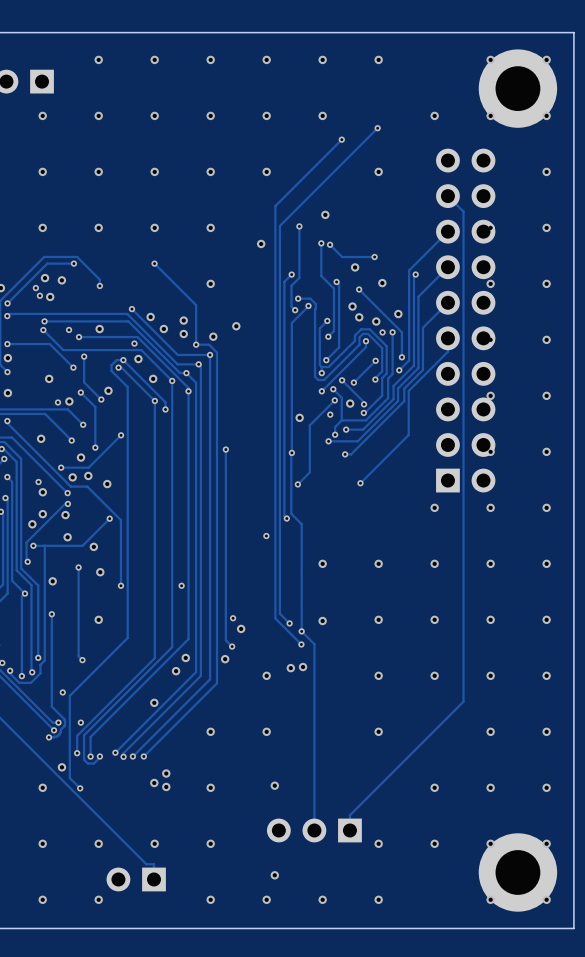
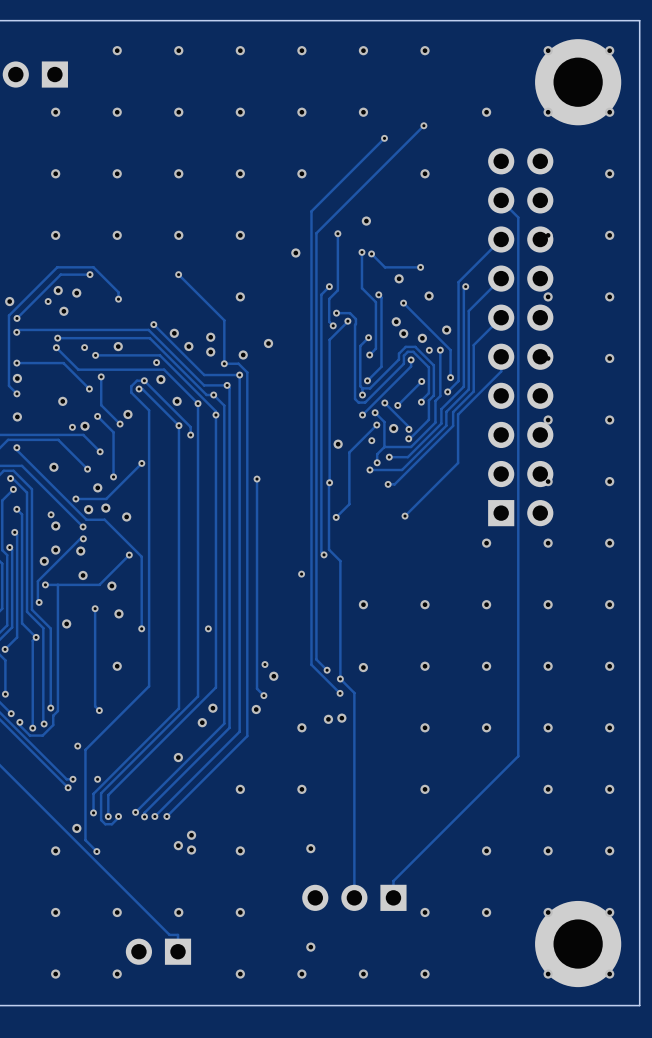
via: (39, 295) -> none
track: (51, 614) (51, 706) (64, 719) (65, 724) (58, 735) (49, 737) -> none
via: (51, 614) -> none
via: (49, 737) -> none

